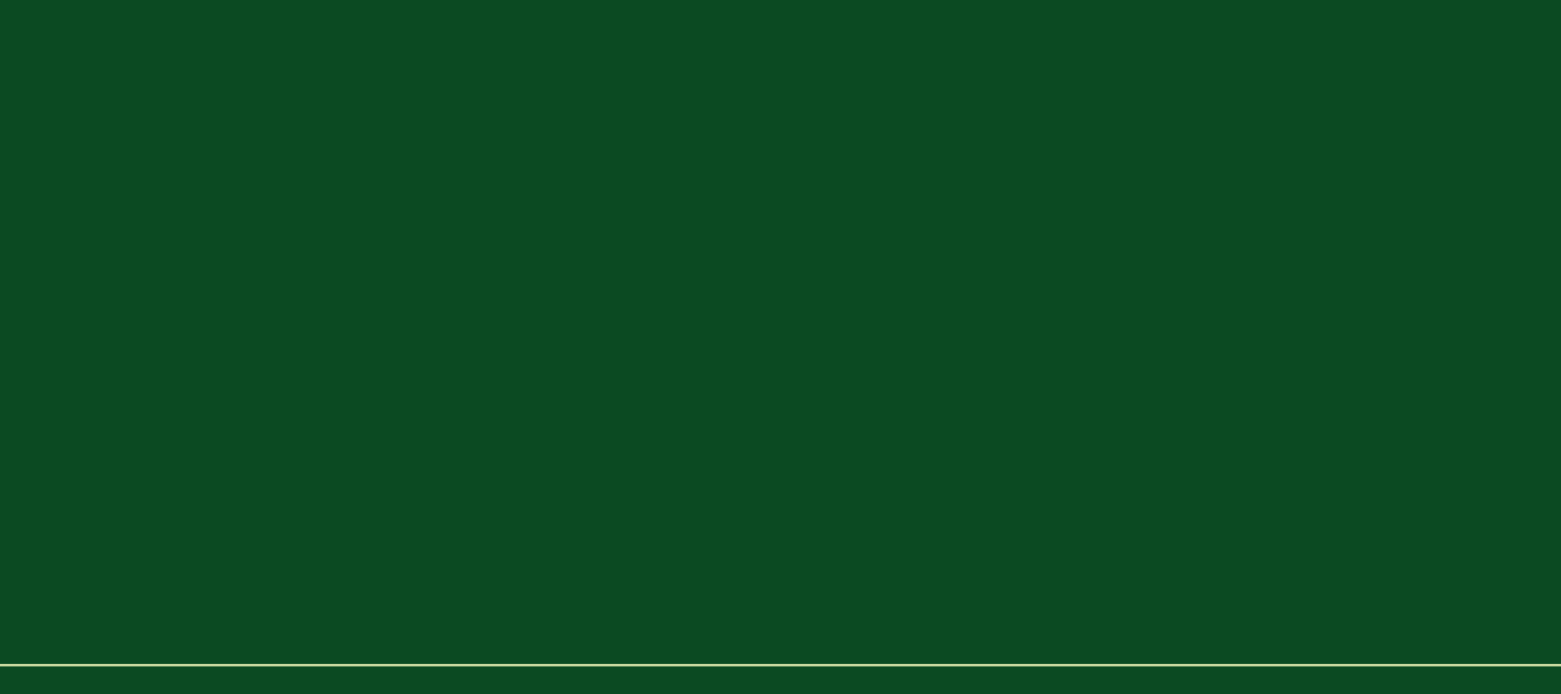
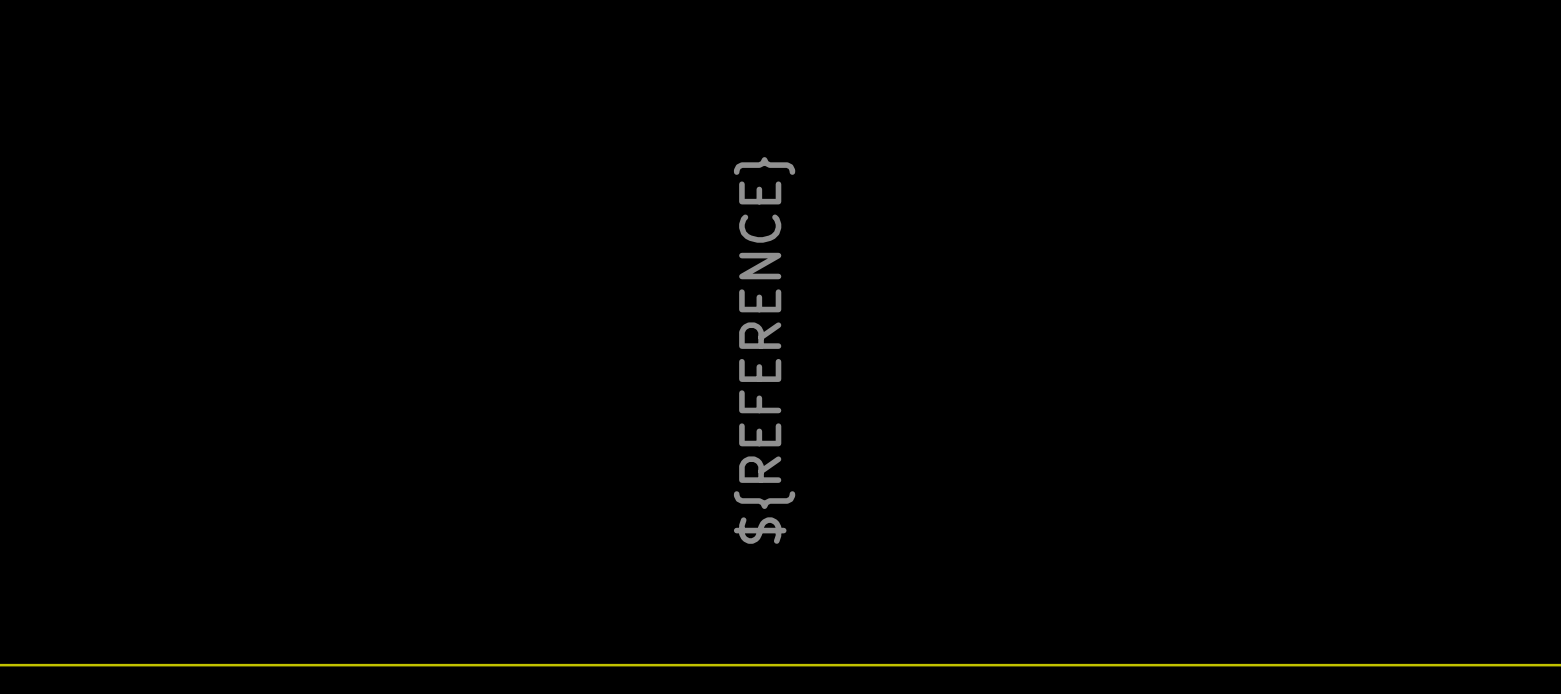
text: none -> ${REFERENCE} (764, 350)

